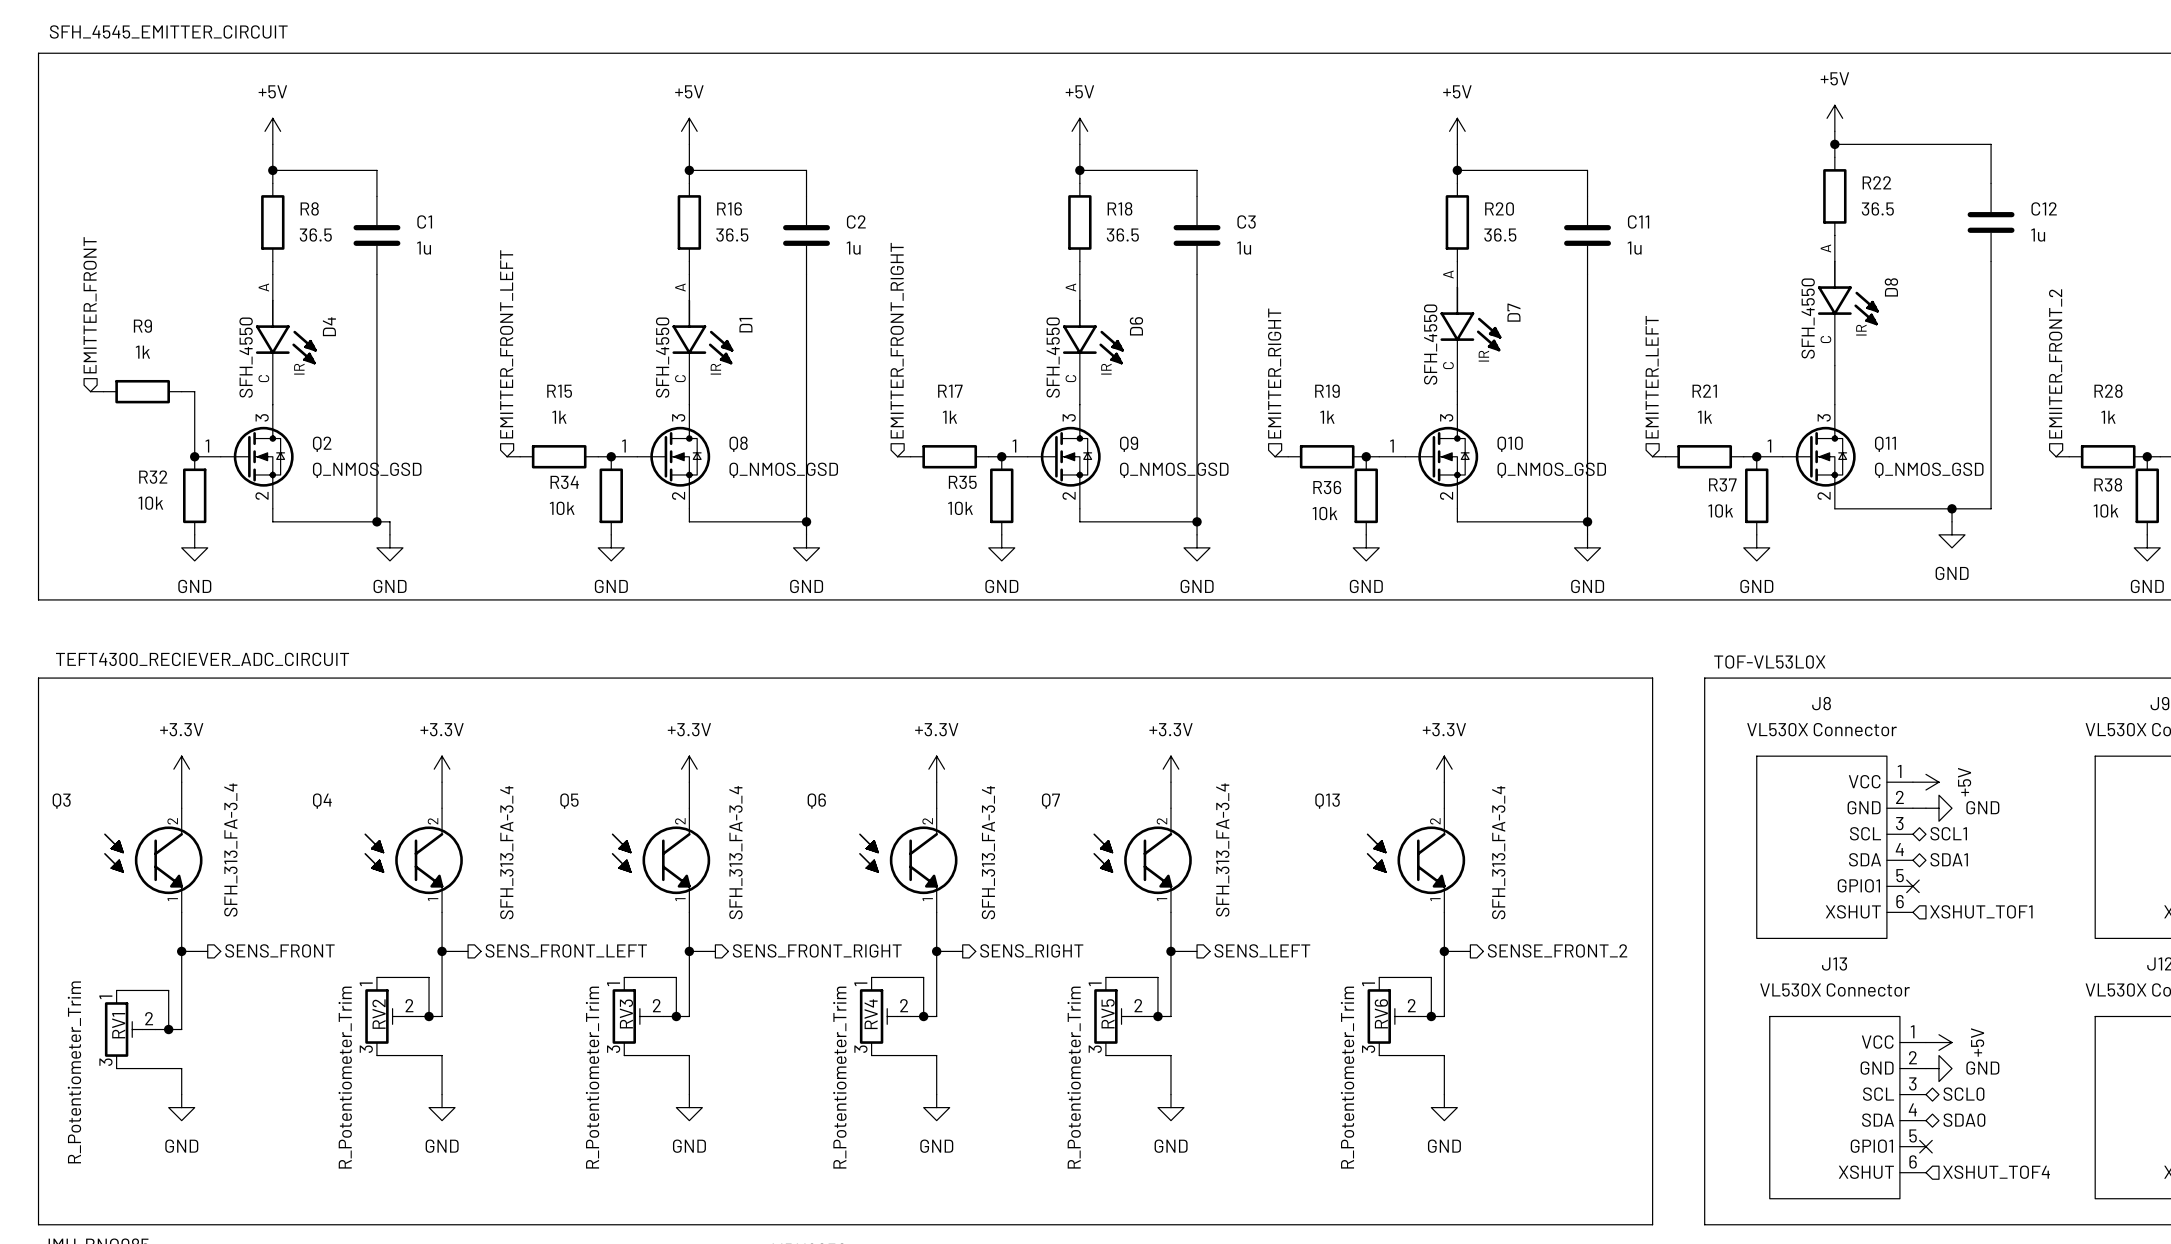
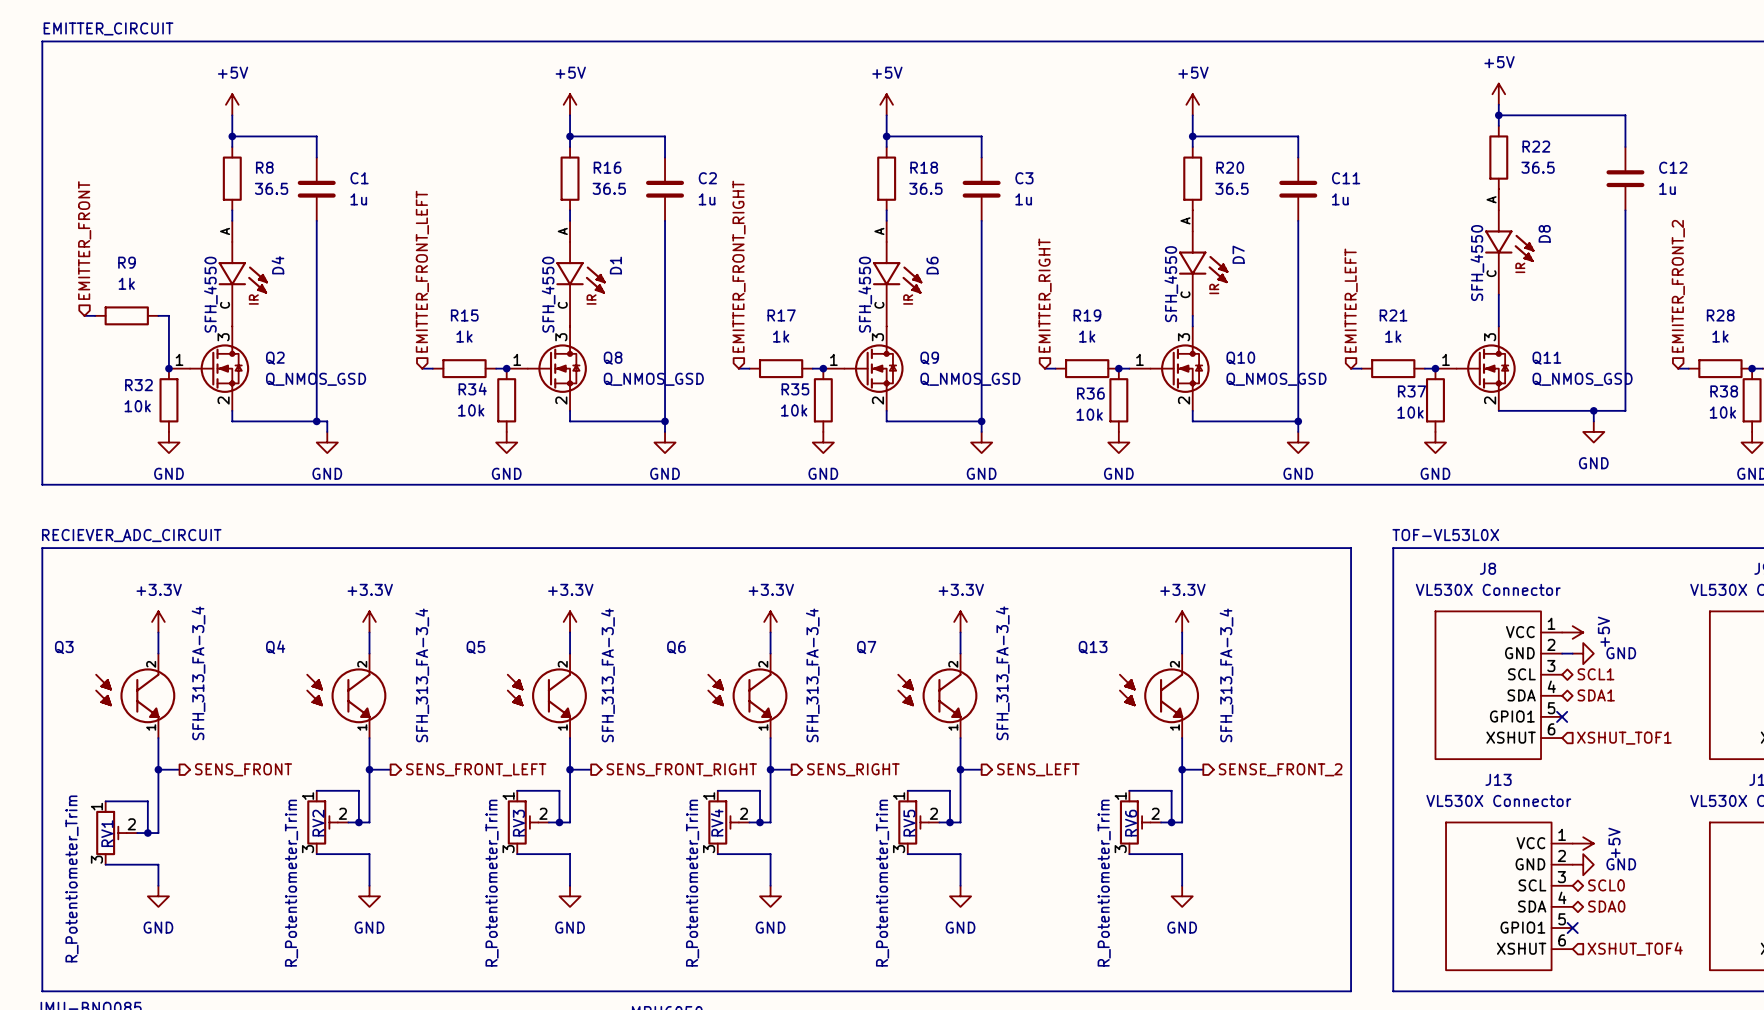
text: SFH_4545_EMITTER_CIRCUIT (168, 31) -> EMITTER_CIRCUIT (108, 28)
text: TEFT4300_RECIEVER_ADC_CIRCUIT (202, 659) -> RECIEVER_ADC_CIRCUIT (131, 535)

